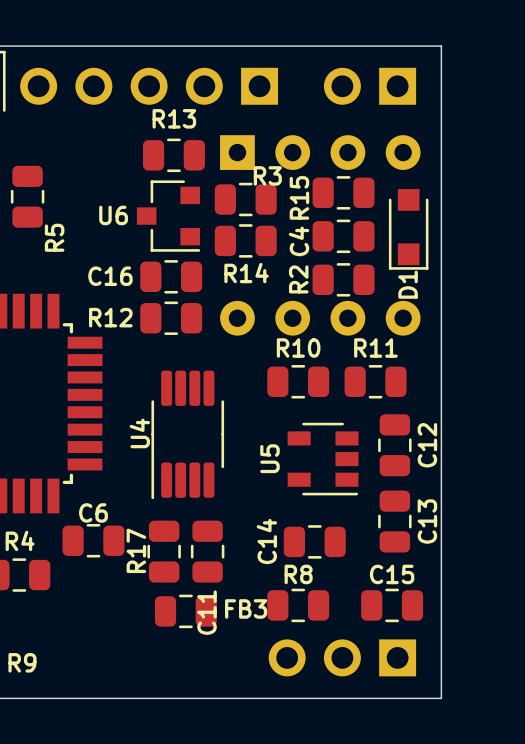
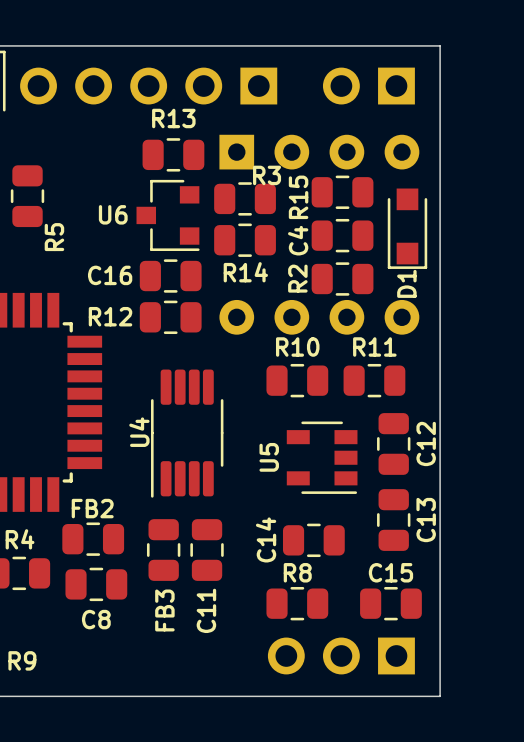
C6 name: C6 (93, 512) -> FB2 (92, 508)
R17 name: R17 (136, 550) -> FB3 (164, 610)
C8: none -> (96, 584)
FB3: (185, 611) -> none

